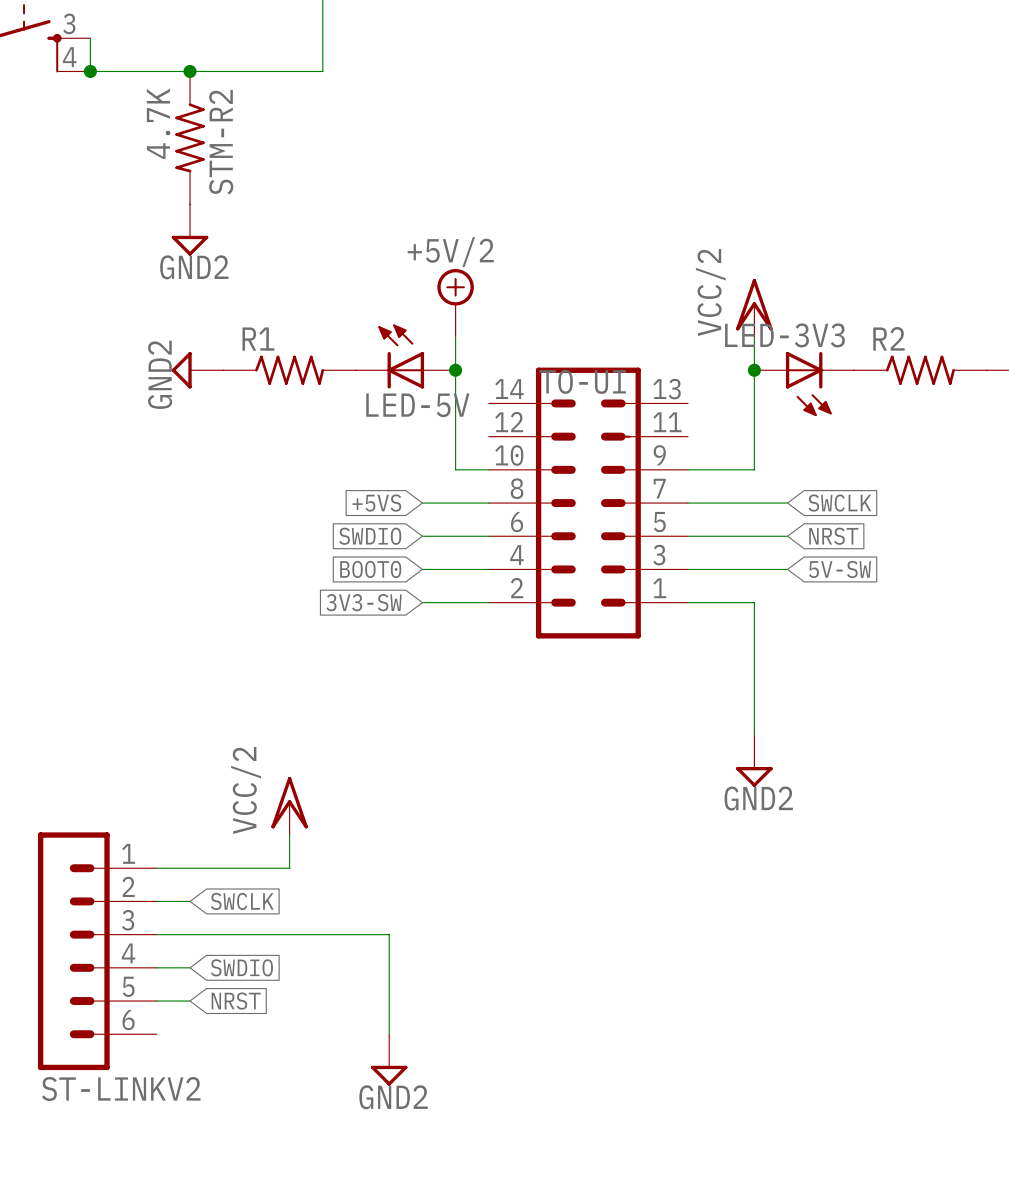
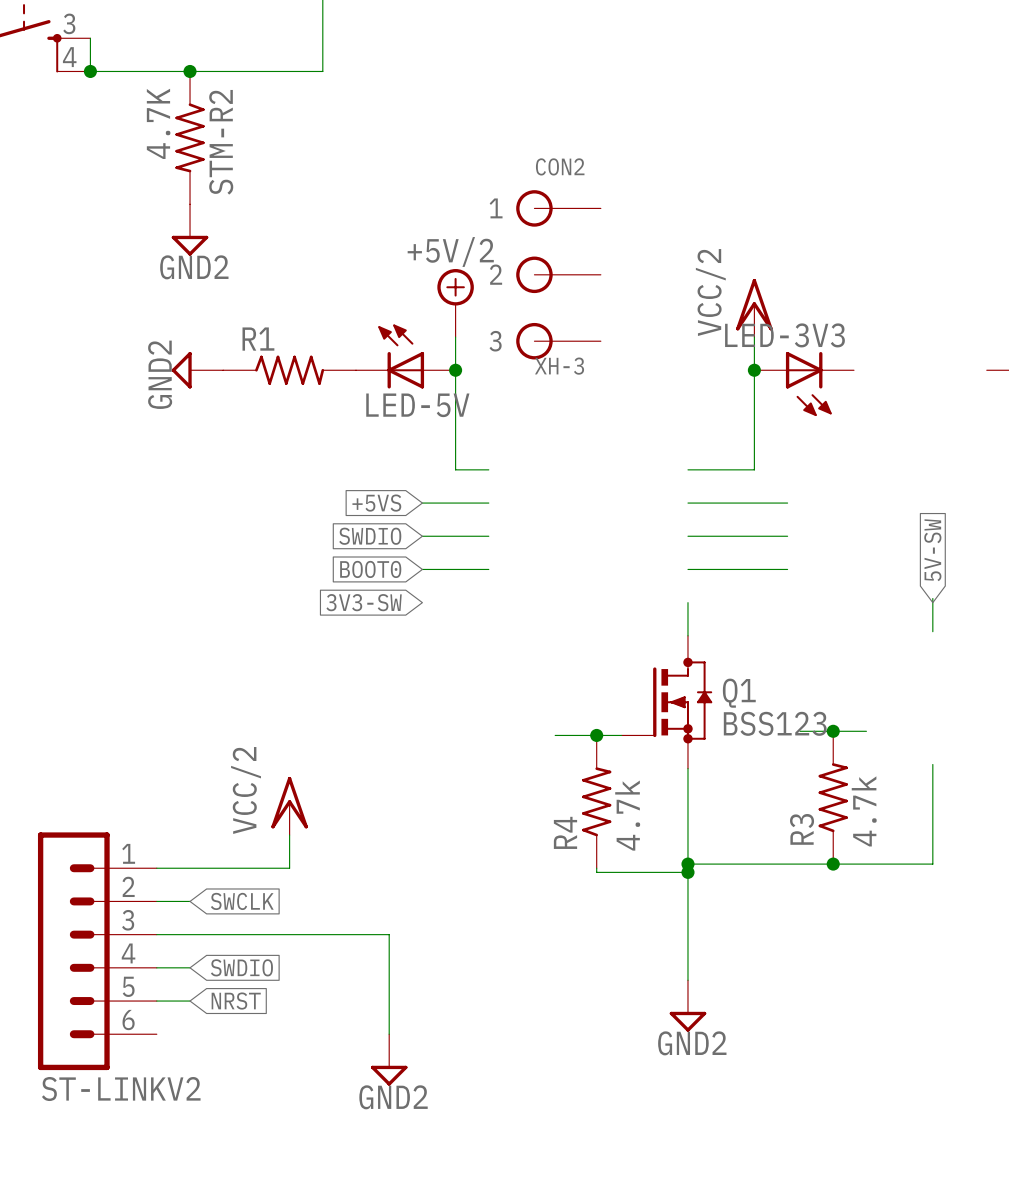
CON2: none -> XH-3 (558, 274)
R2: (920, 370) -> none
TO-UI: (588, 503) -> none
global label: SWCLK (839, 503) -> none
global label: NRST (833, 536) -> none
global label rotation: 0° (840, 569) -> 90° counterclockwise (932, 550)
wire: none -> (932, 598) (932, 631)
wire: (422, 602) (488, 602) -> (555, 735) (621, 735)
wire: (687, 602) (754, 602) (754, 735) -> (687, 602) (687, 635)
Q1: none -> BSS123 (666, 702)
wire: none -> (800, 731) (866, 731)
junction: none -> (833, 731)
junction: none -> (596, 735)
power symbol position: GND2 (754, 761) -> GND2 (687, 1006)
wire: none -> (932, 764) (932, 864) (687, 864)
wire: none -> (687, 768) (687, 980)
R3: none -> 4.7k (833, 797)
R4: none -> 4.7k (596, 801)
junction: none -> (687, 864)
junction: none -> (833, 864)
wire: none -> (596, 868) (596, 872) (687, 872)
junction: none -> (687, 872)

